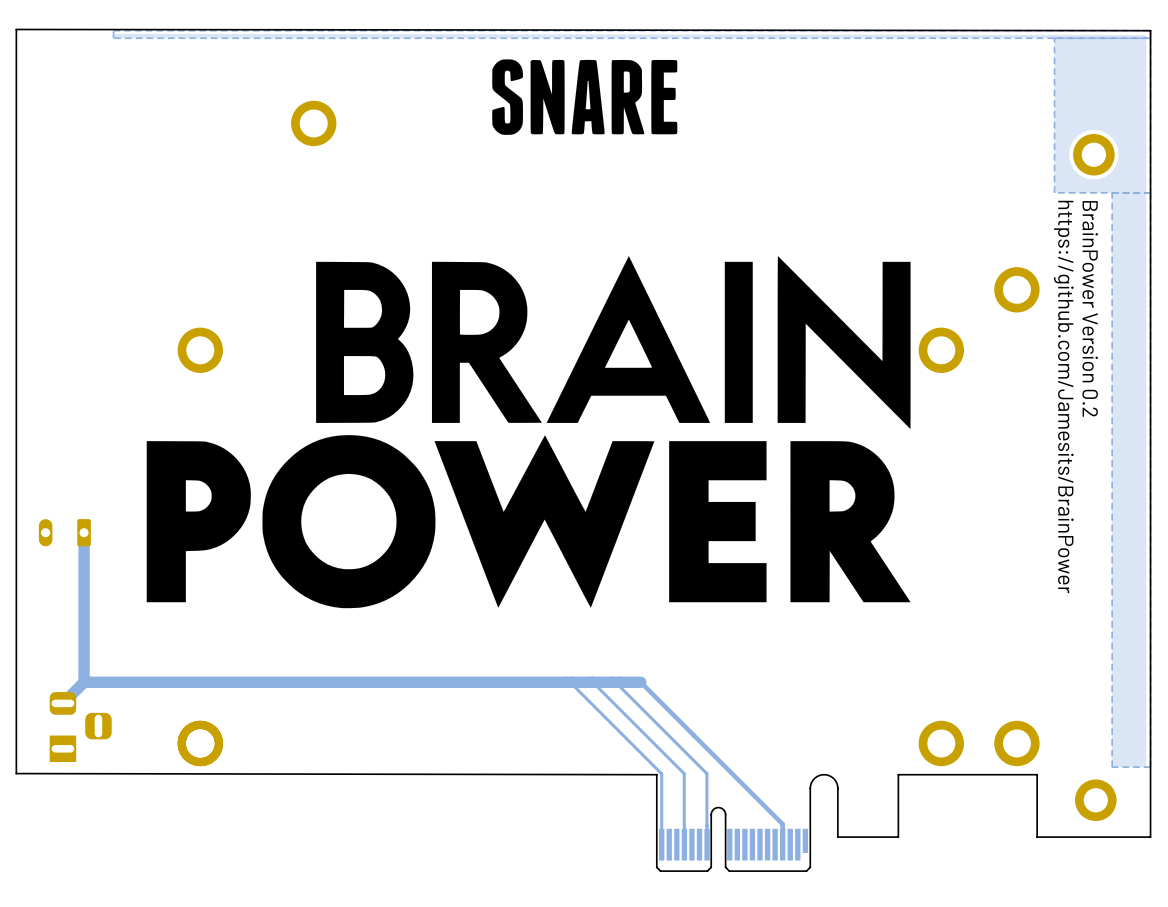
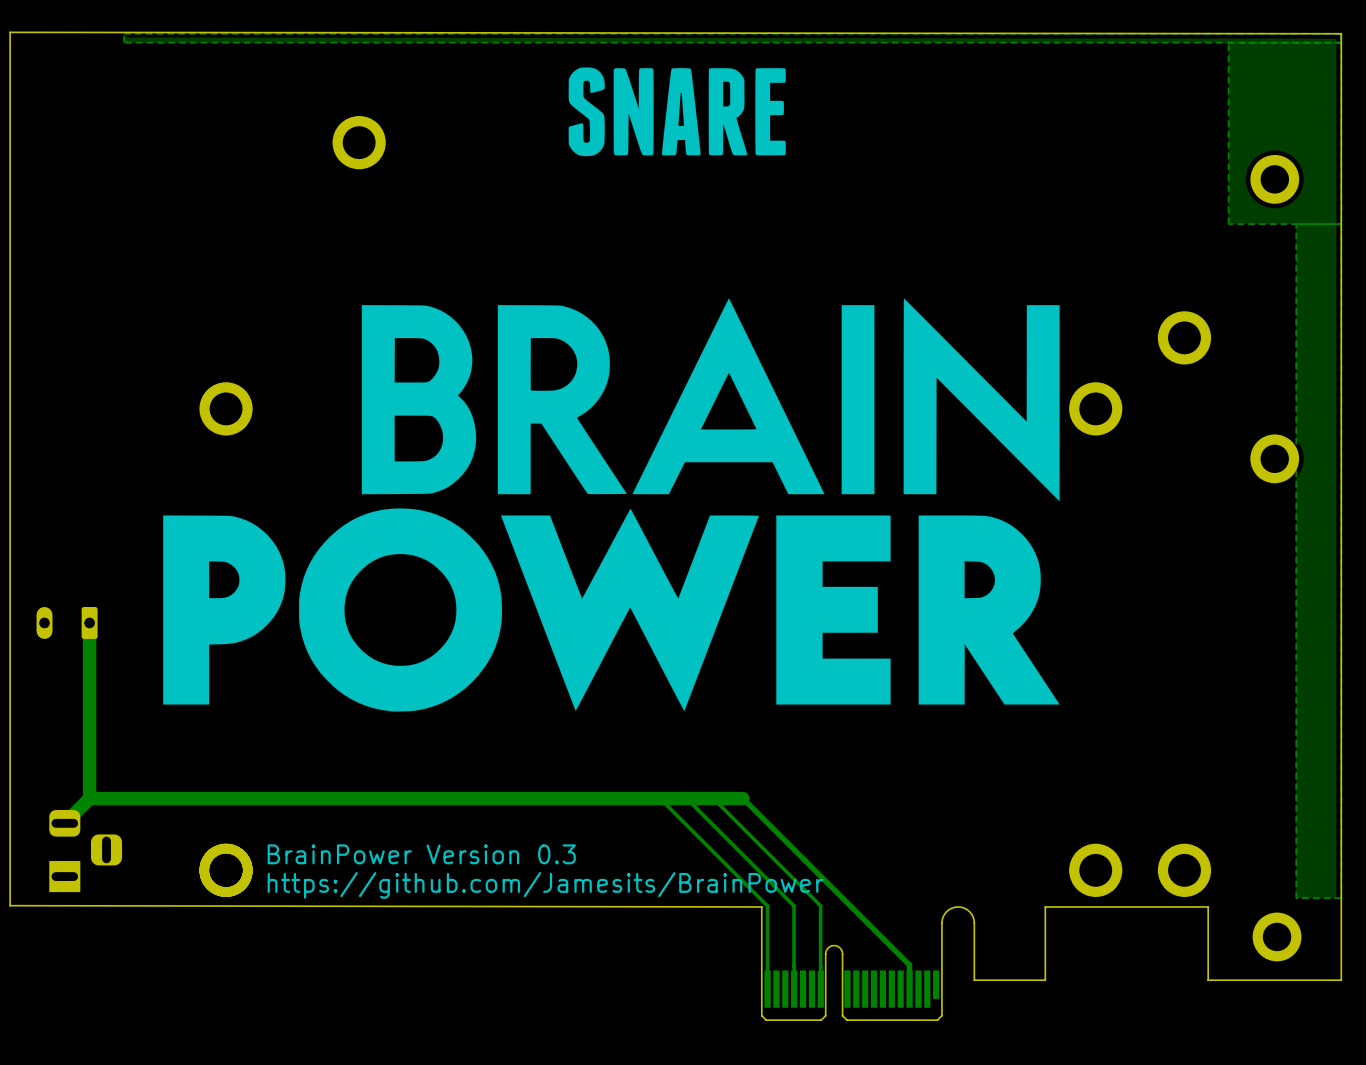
text: BrainPower Version 0.2 (1090, 308) -> none
part: none -> (1274, 458)
text: https://github.com/Jamesits/BrainPower (1063, 397) -> none
text: none -> BrainPower Version 0.3 (421, 854)
text: none -> https://github.com/Jamesits/BrainPower (545, 885)

